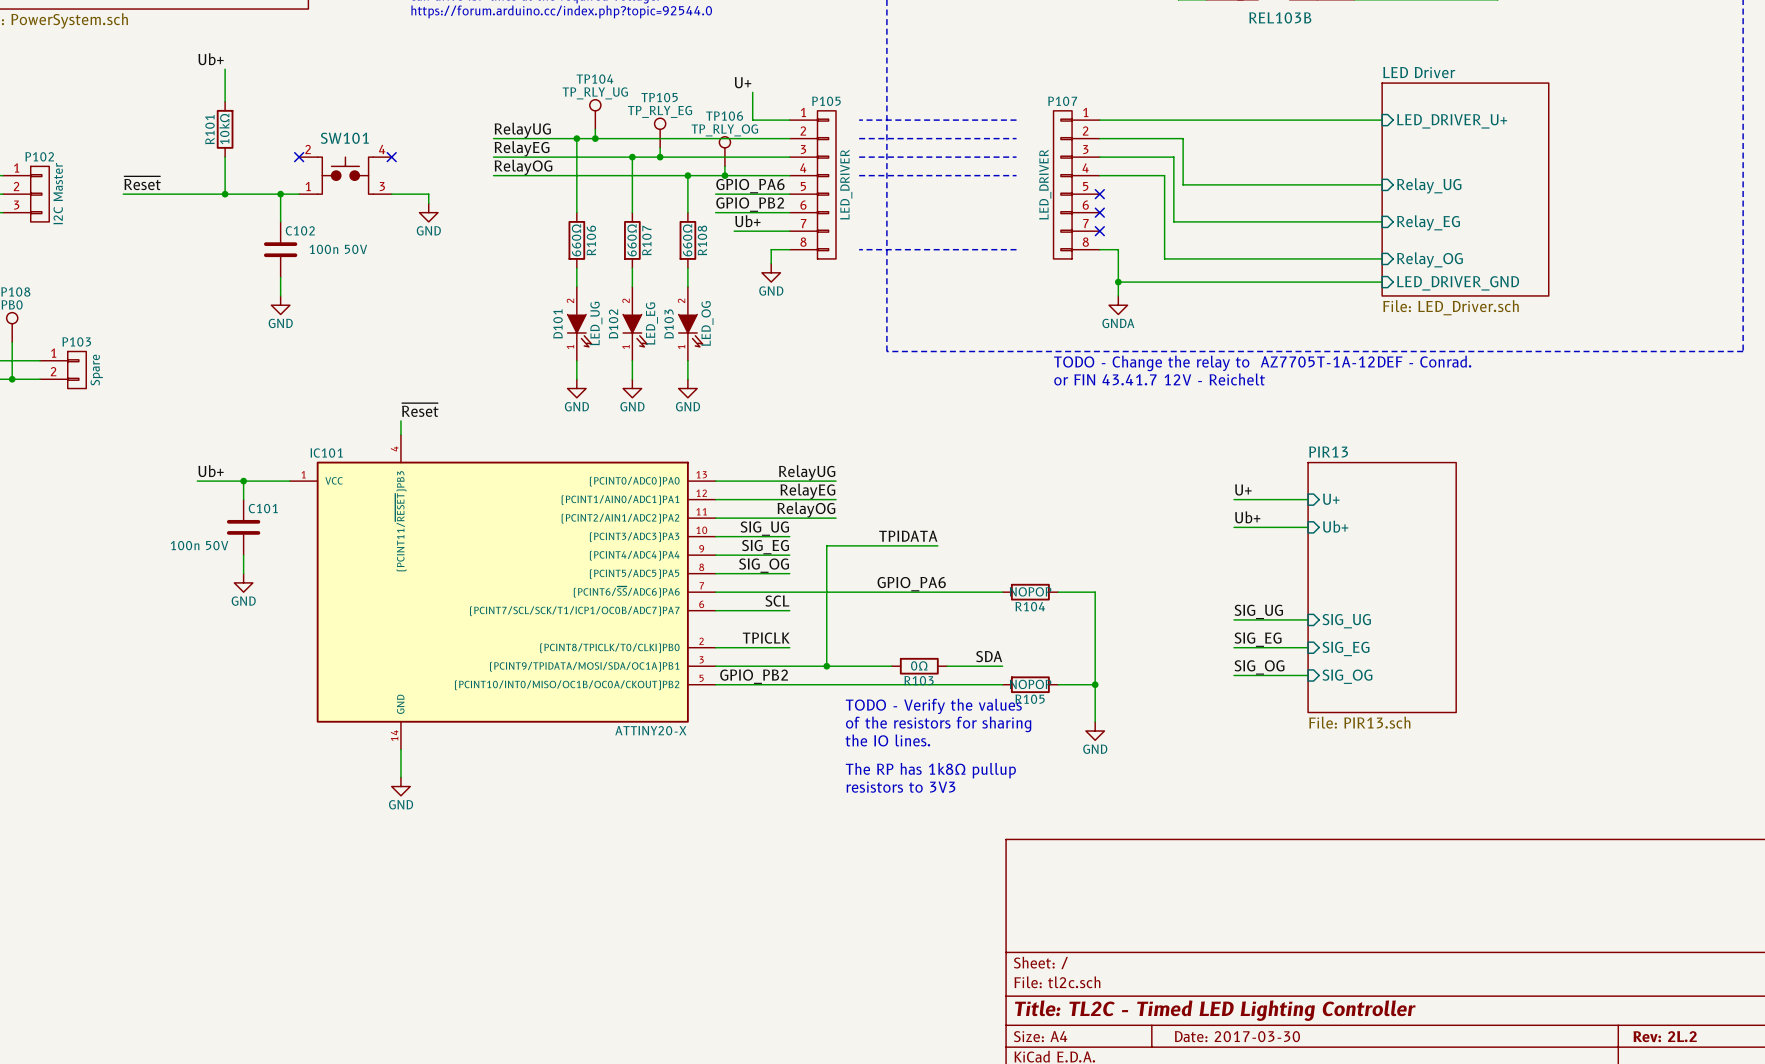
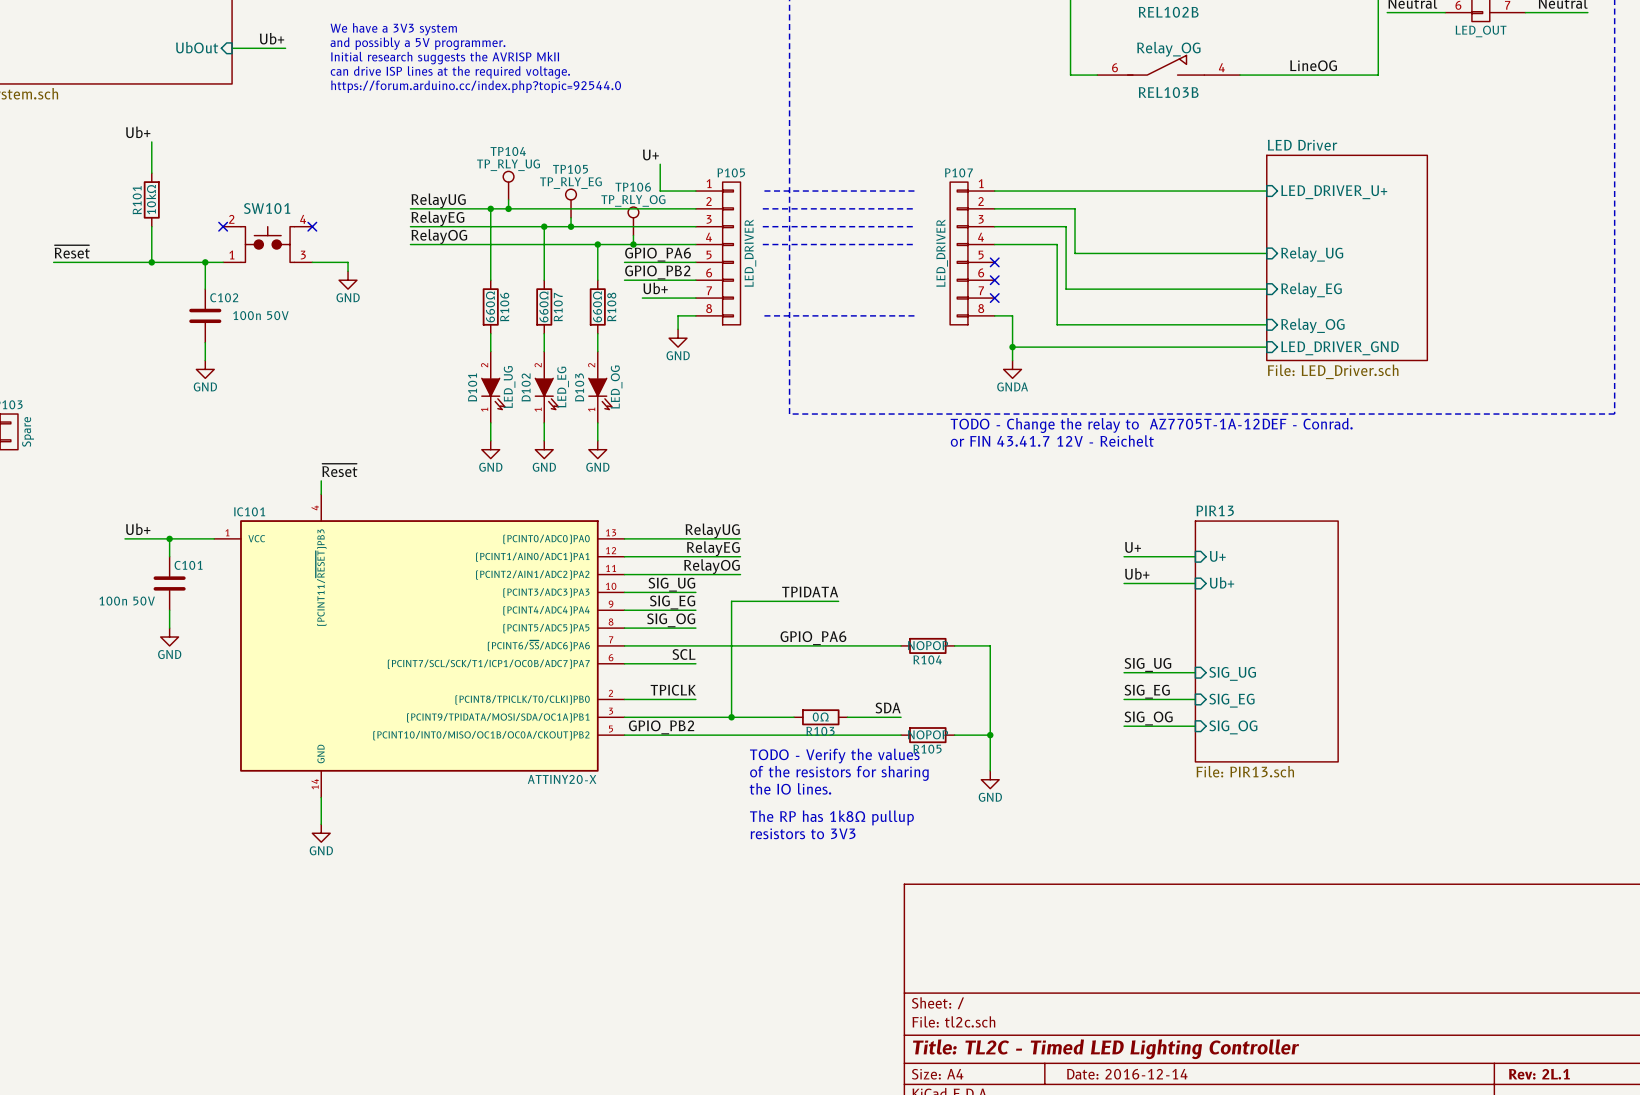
title block: Date: 2017-03-30 (1237, 1036) -> Date: 2016-12-14 (1127, 1074)
title block: Rev: 2L.2 (1665, 1036) -> Rev: 2L.1 (1539, 1074)

